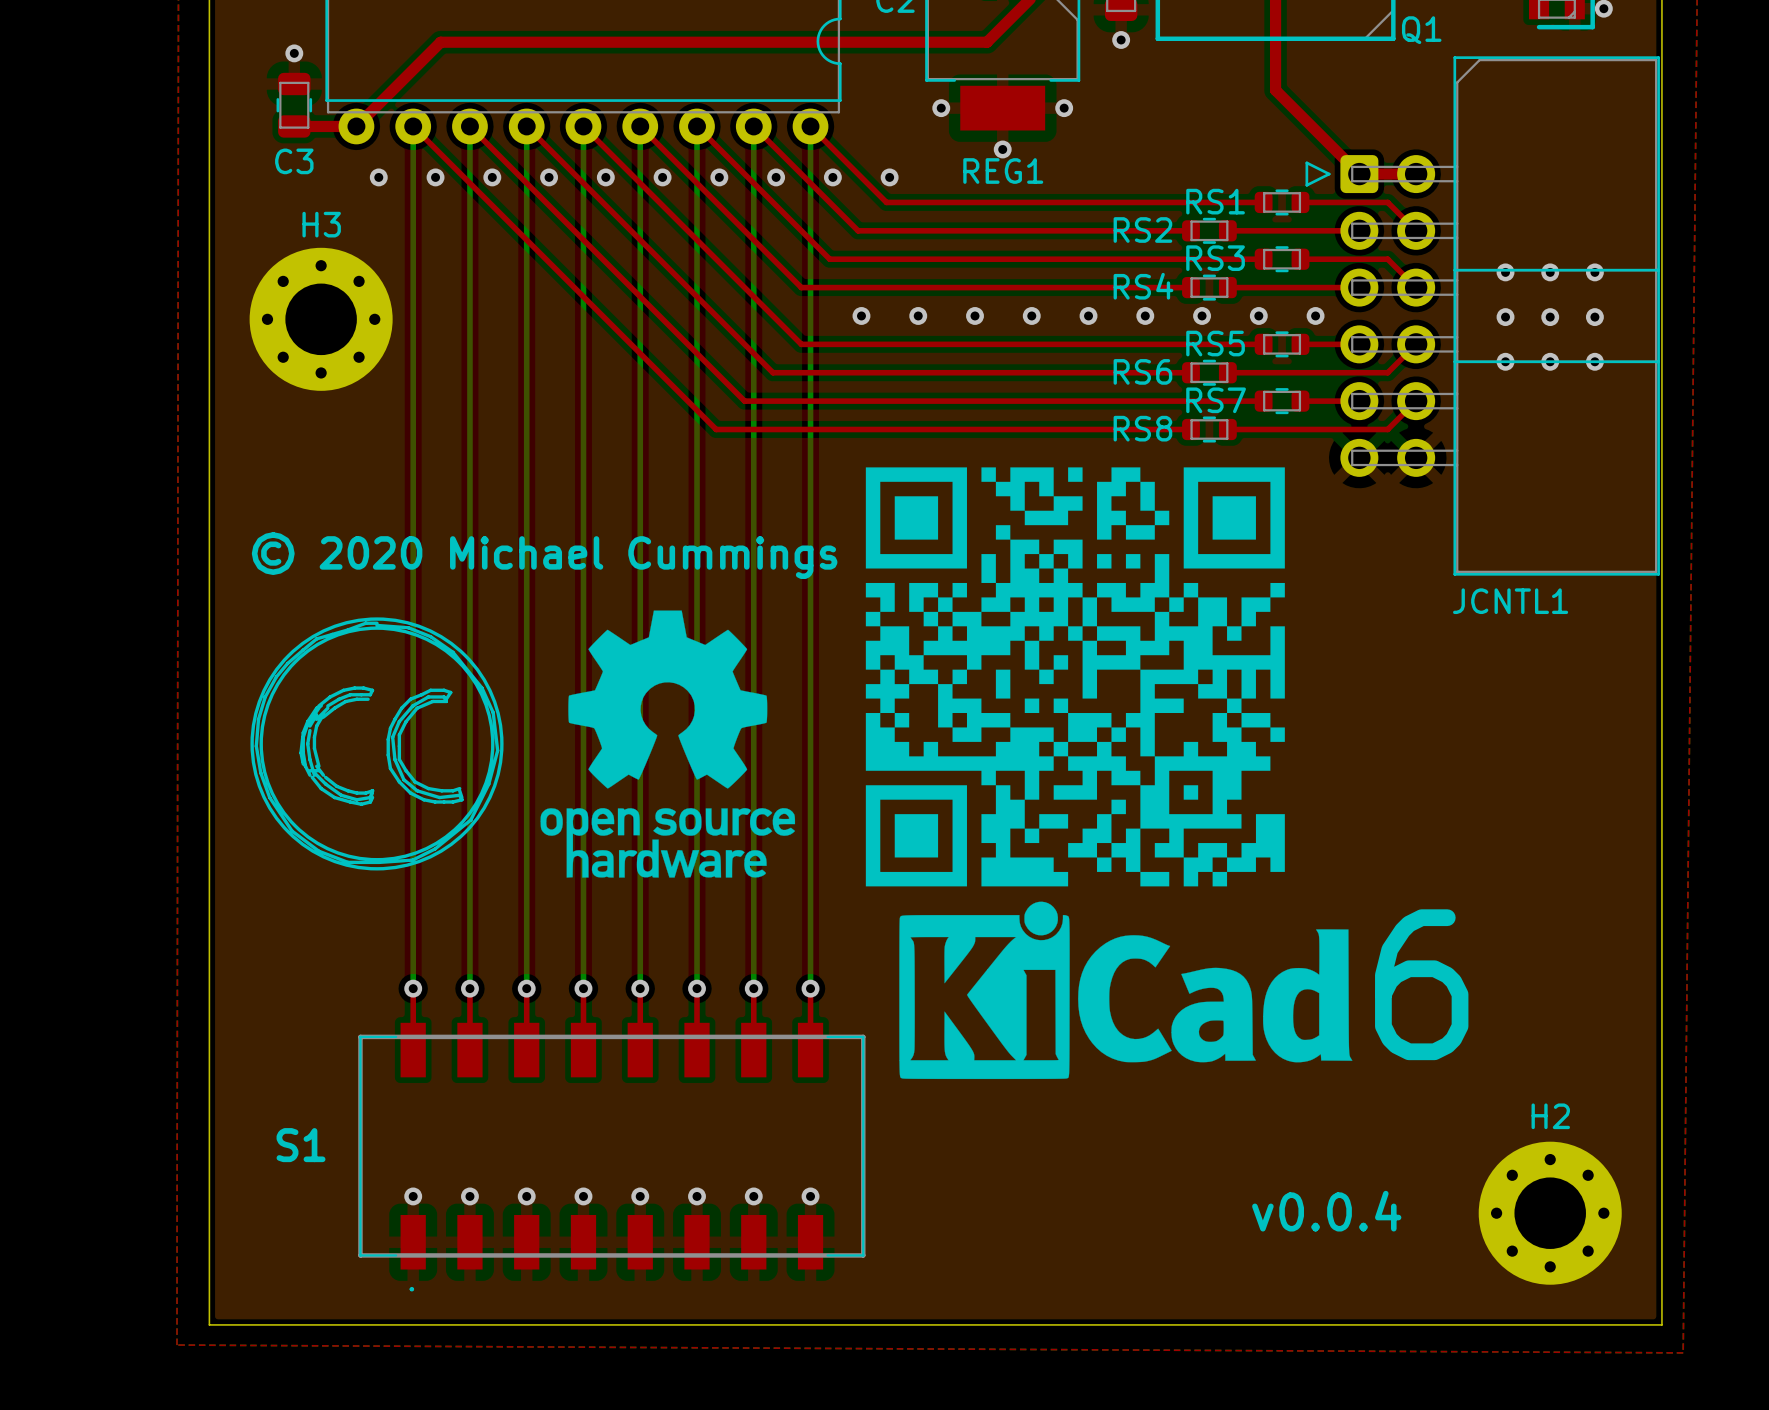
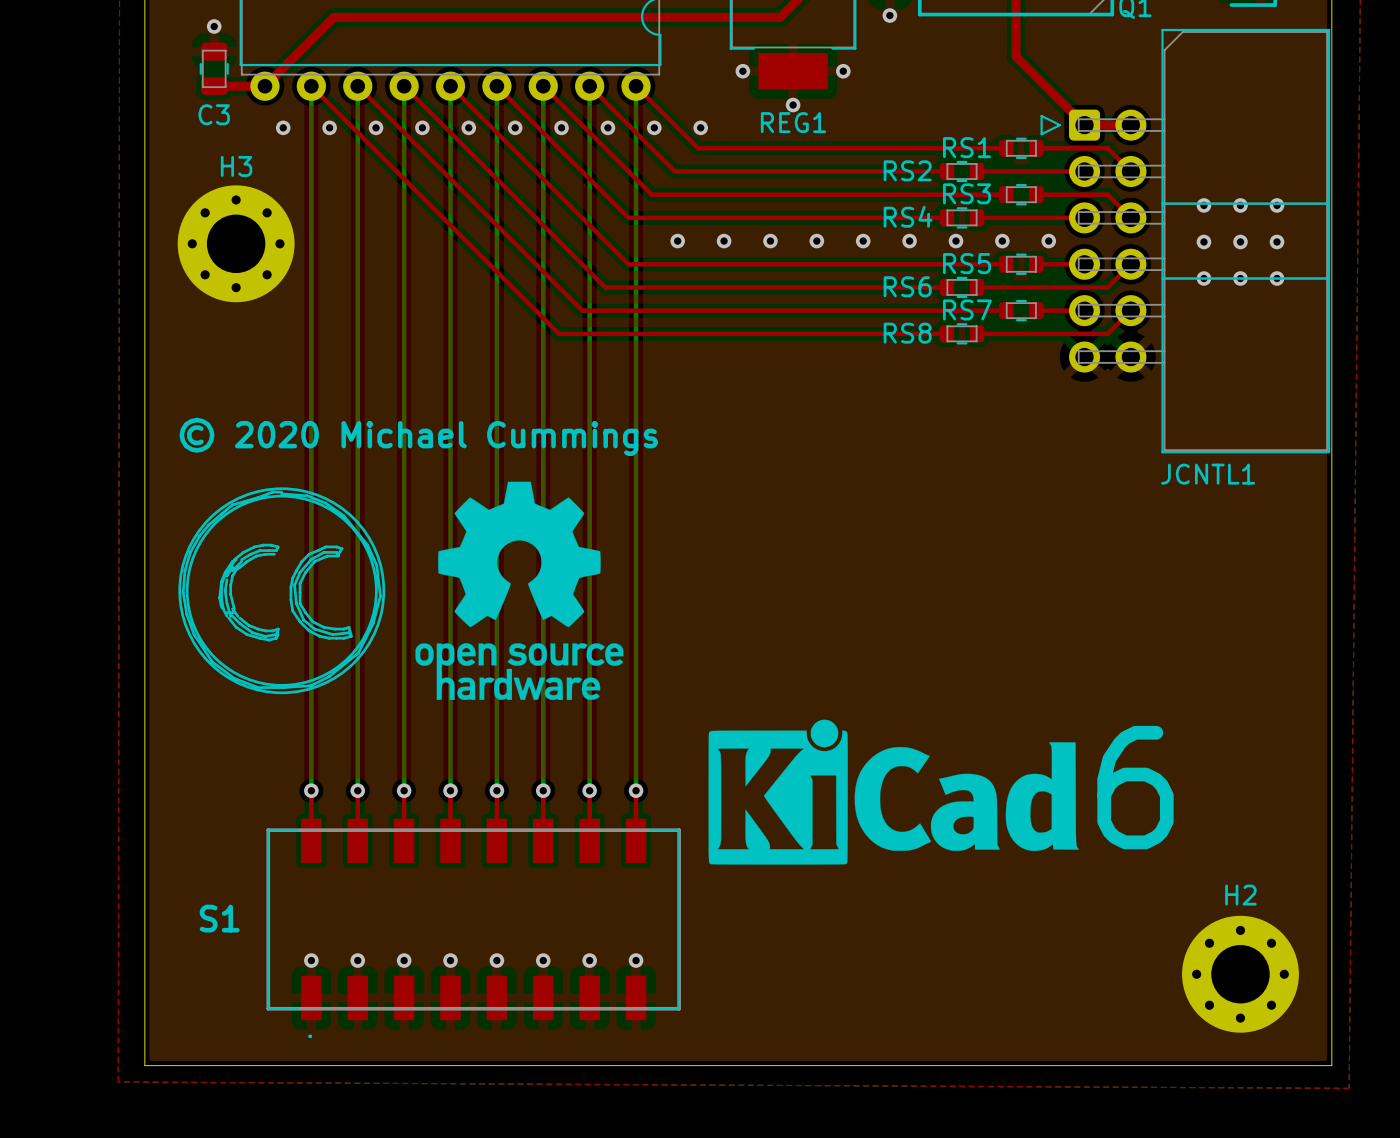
drawing: [865, 467, 1285, 887] -> none
text: v0.0.4 (1326, 1211) -> none

